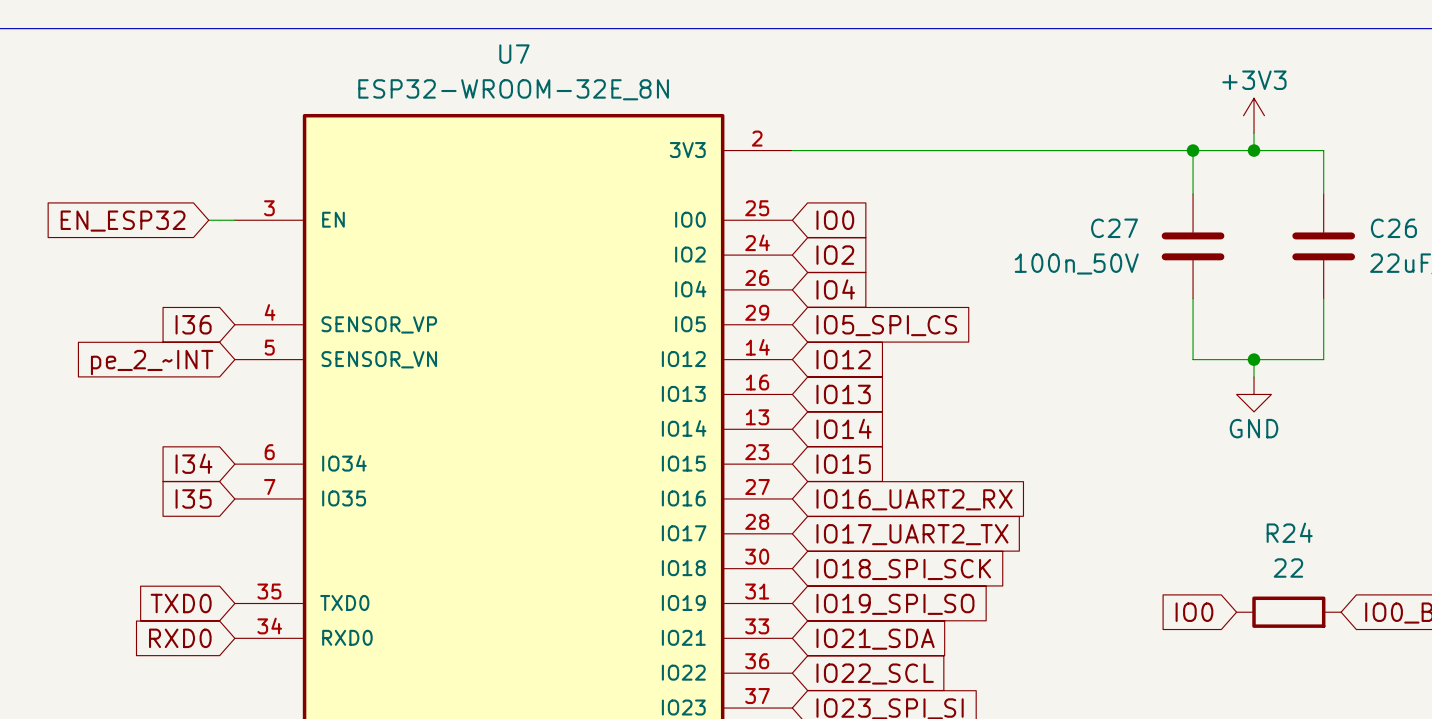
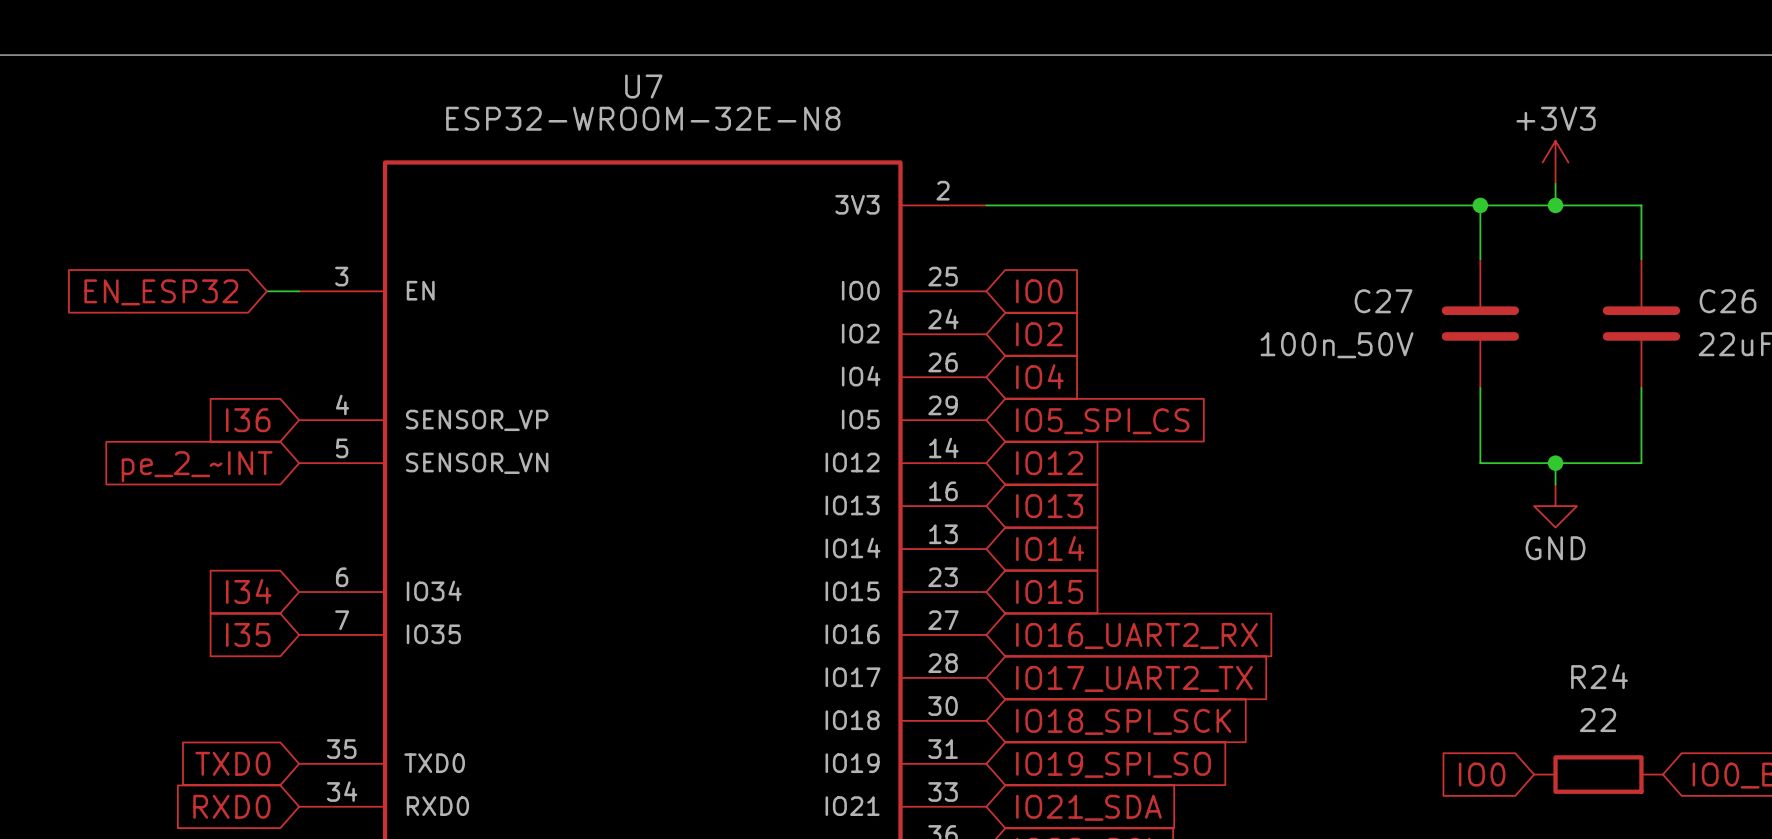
U7 value: ESP32-WROOM-32E_8N (513, 89) -> ESP32-WROOM-32E-N8 (643, 118)

